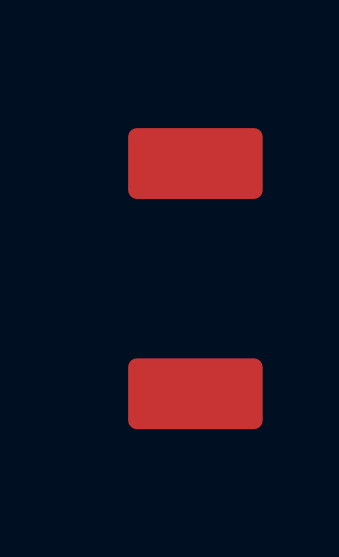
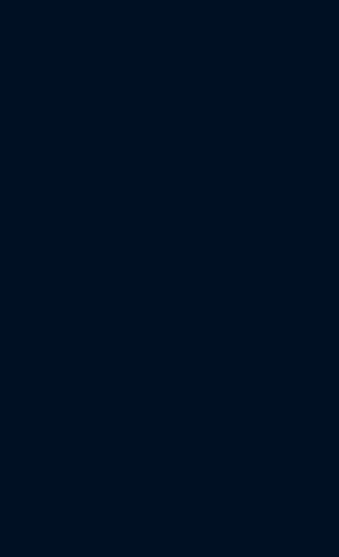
part: (195, 163) -> none
part: (195, 393) -> none

